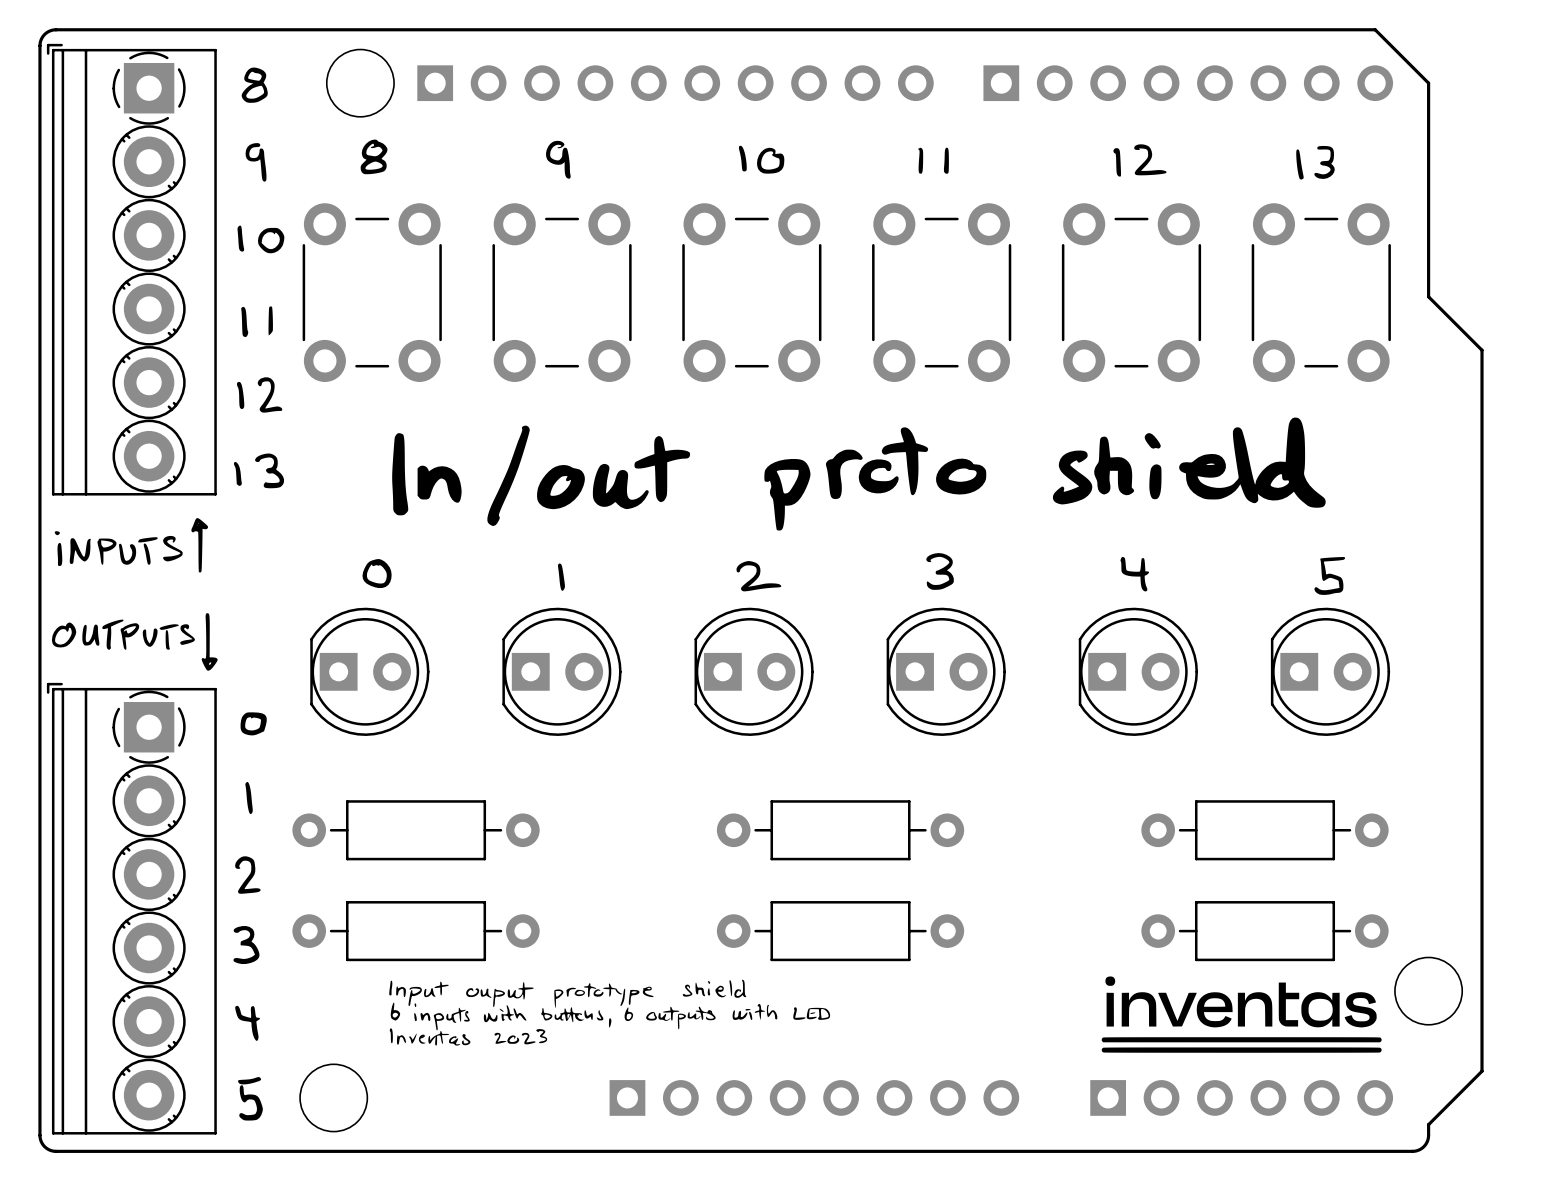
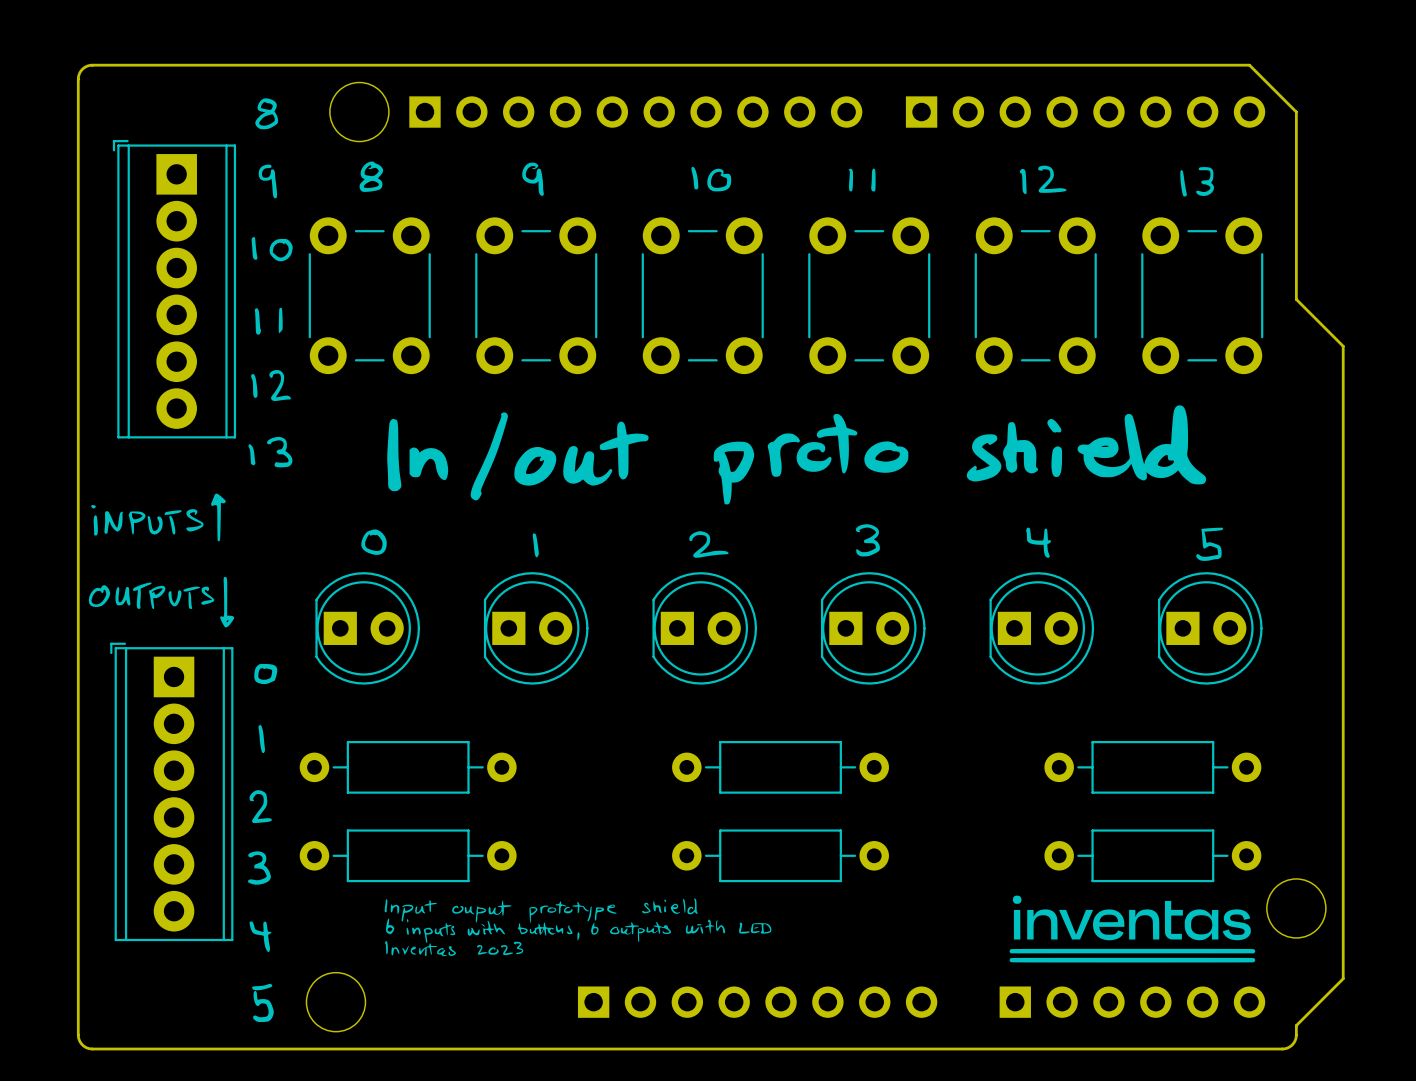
part: (131, 269) -> none
part: none -> (174, 289)
part: none -> (171, 791)
part: (131, 908) -> none

